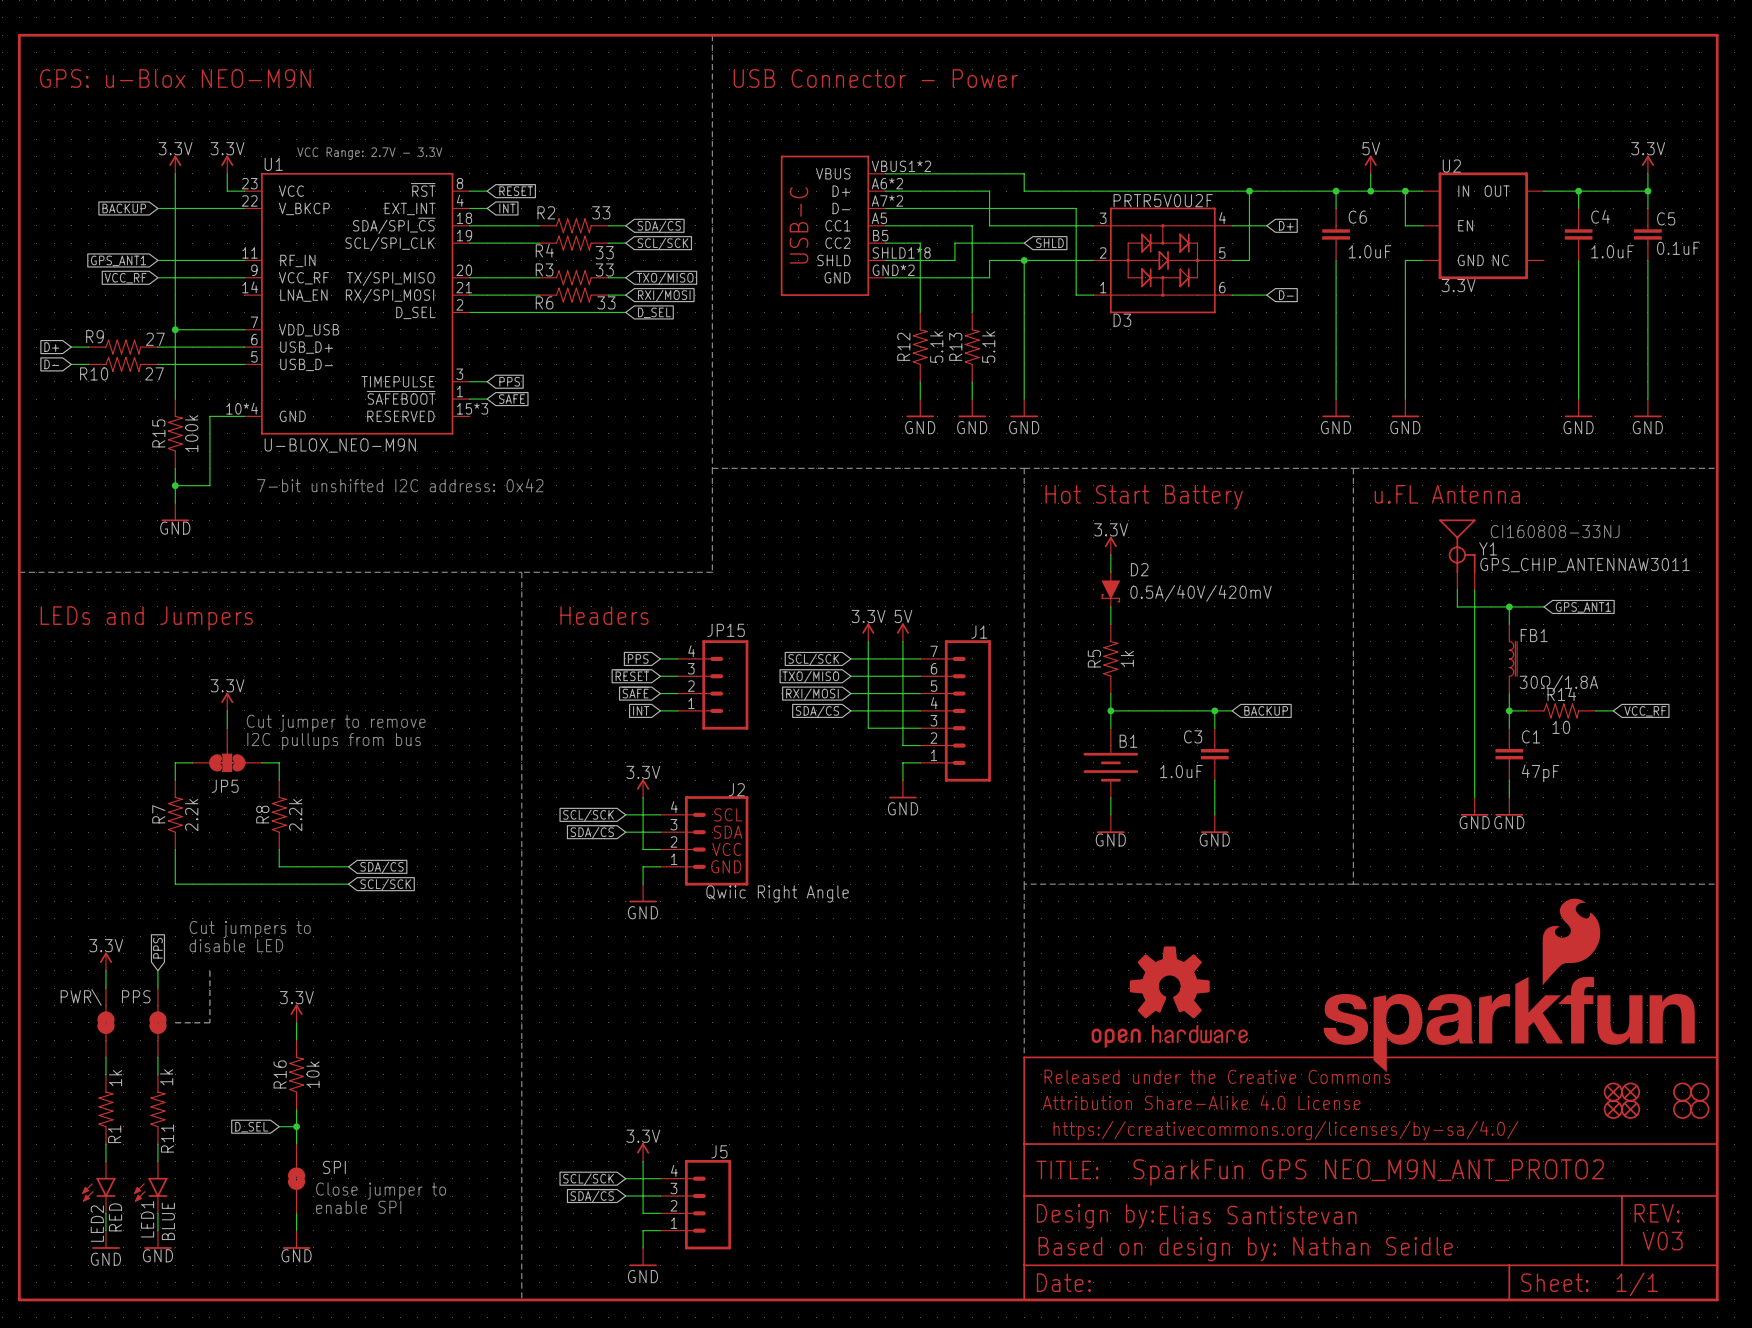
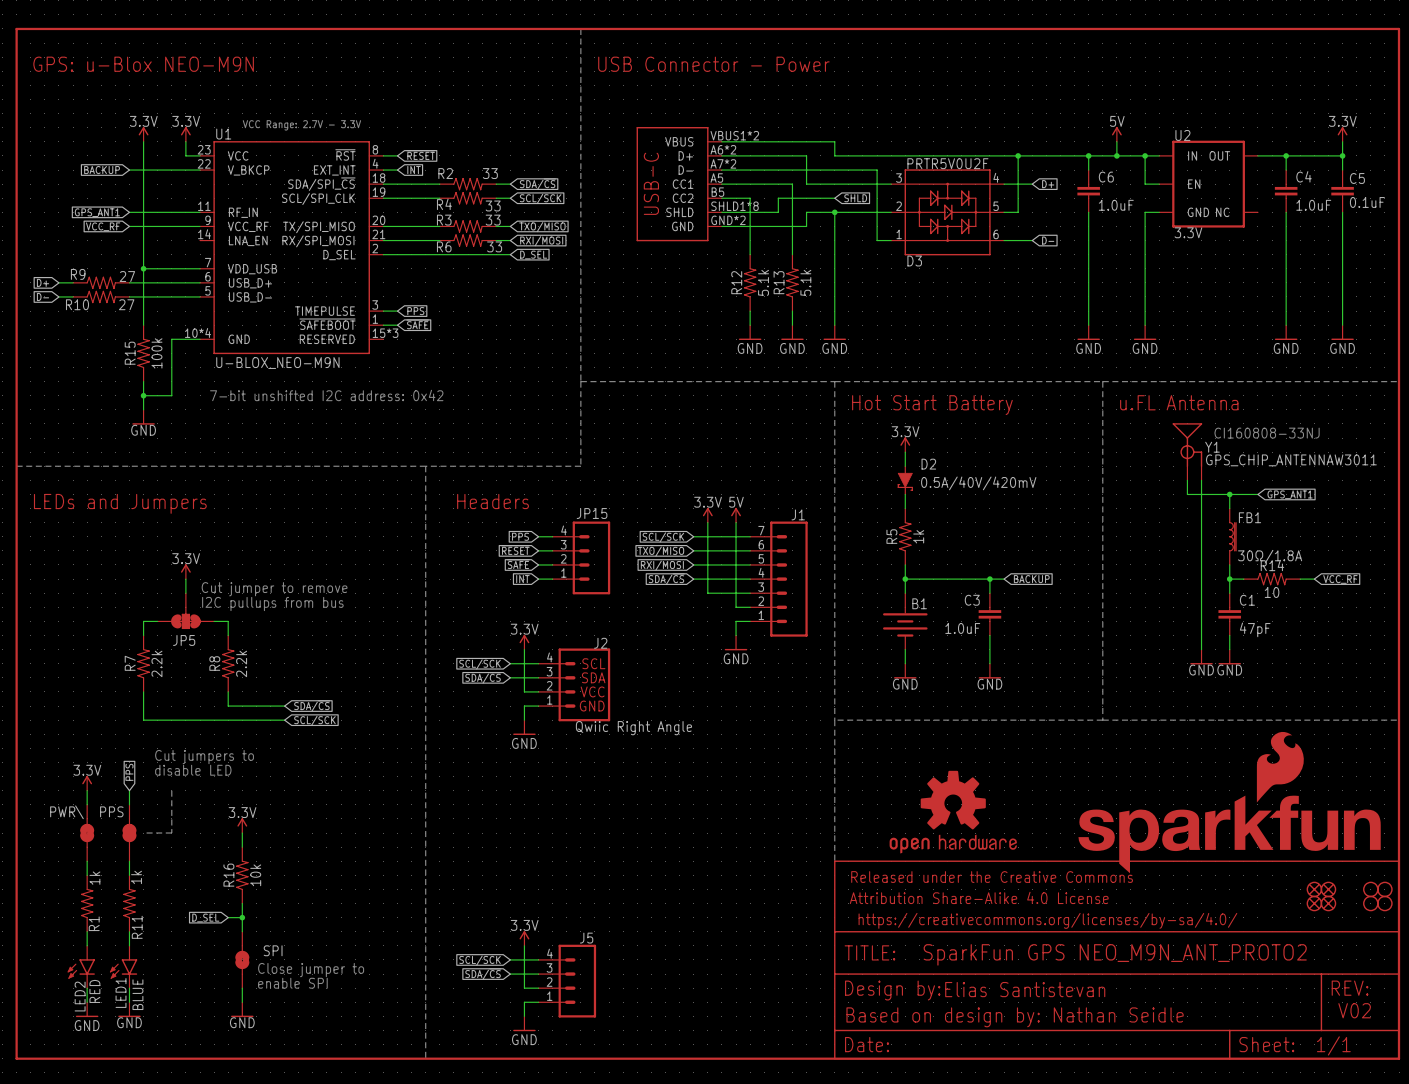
text: V03 (1662, 1241) -> V02 (1354, 1010)

